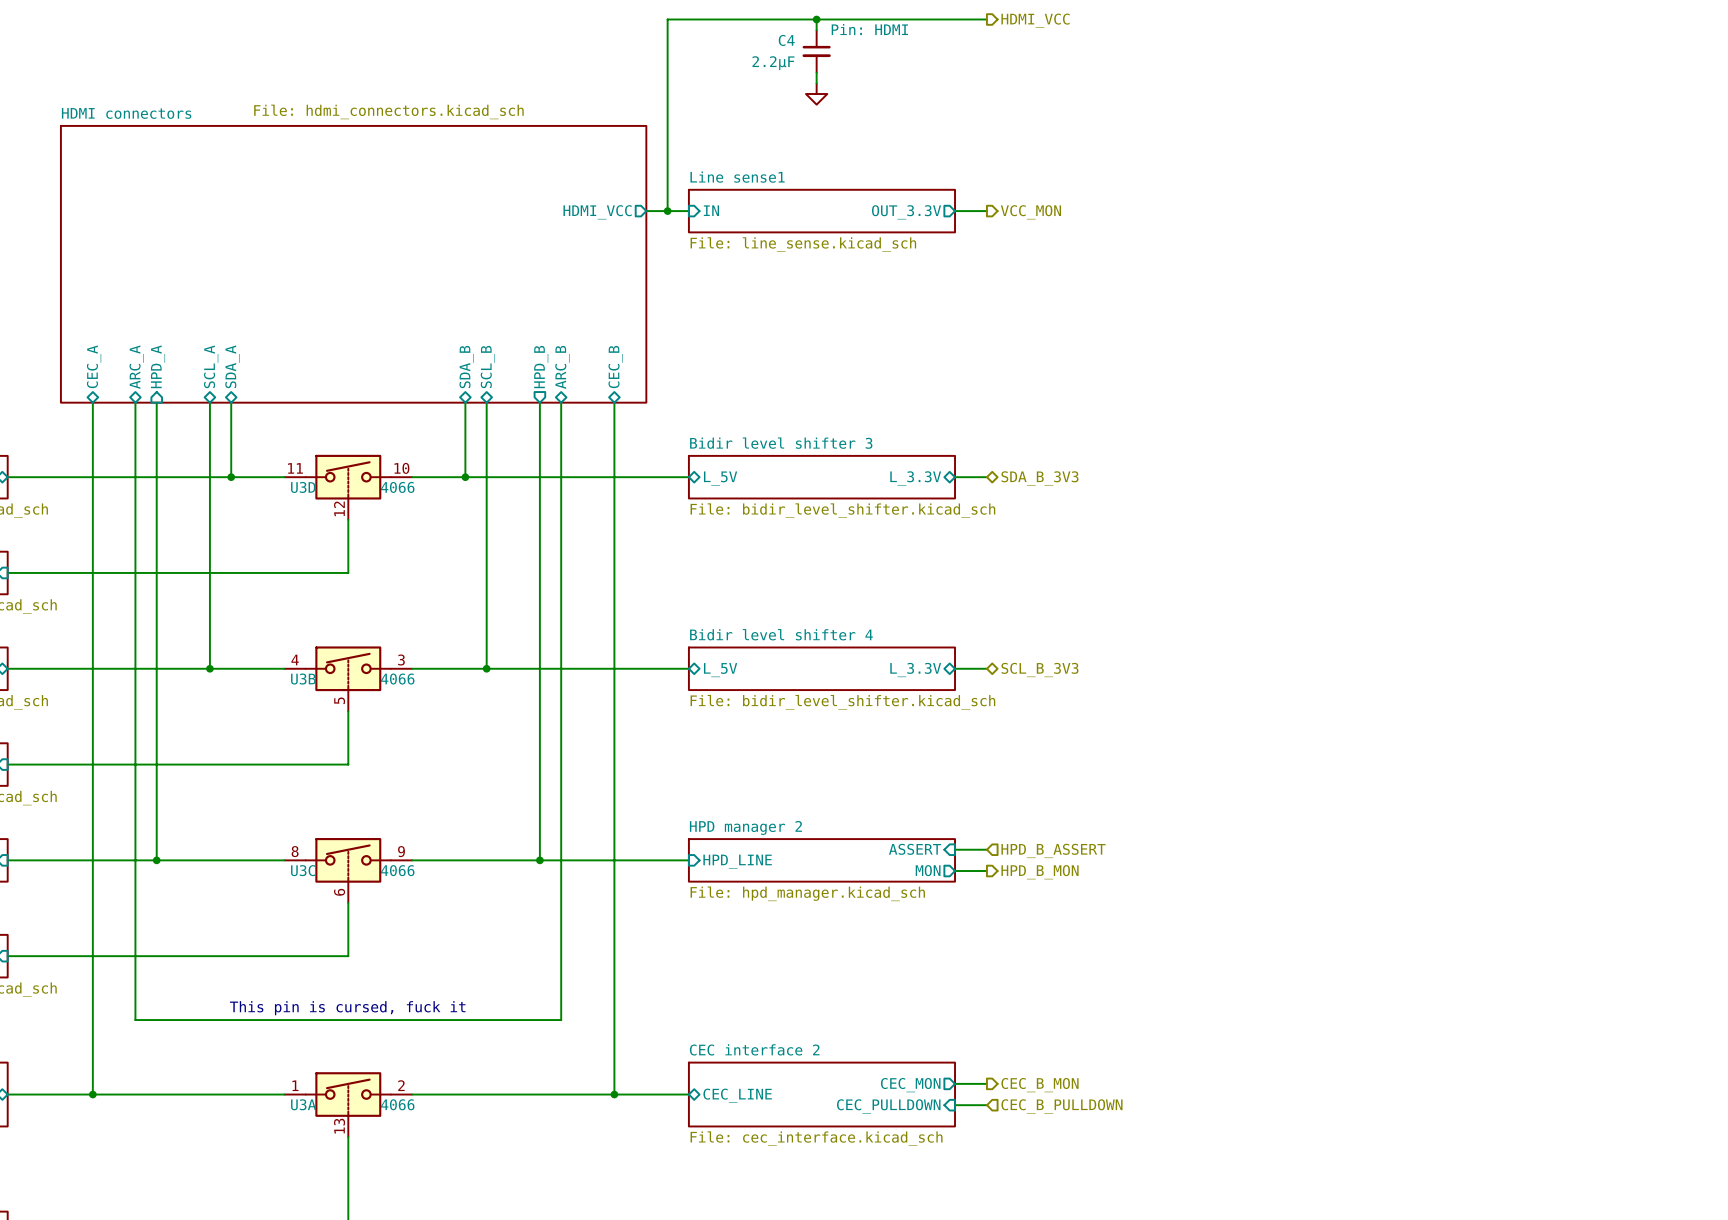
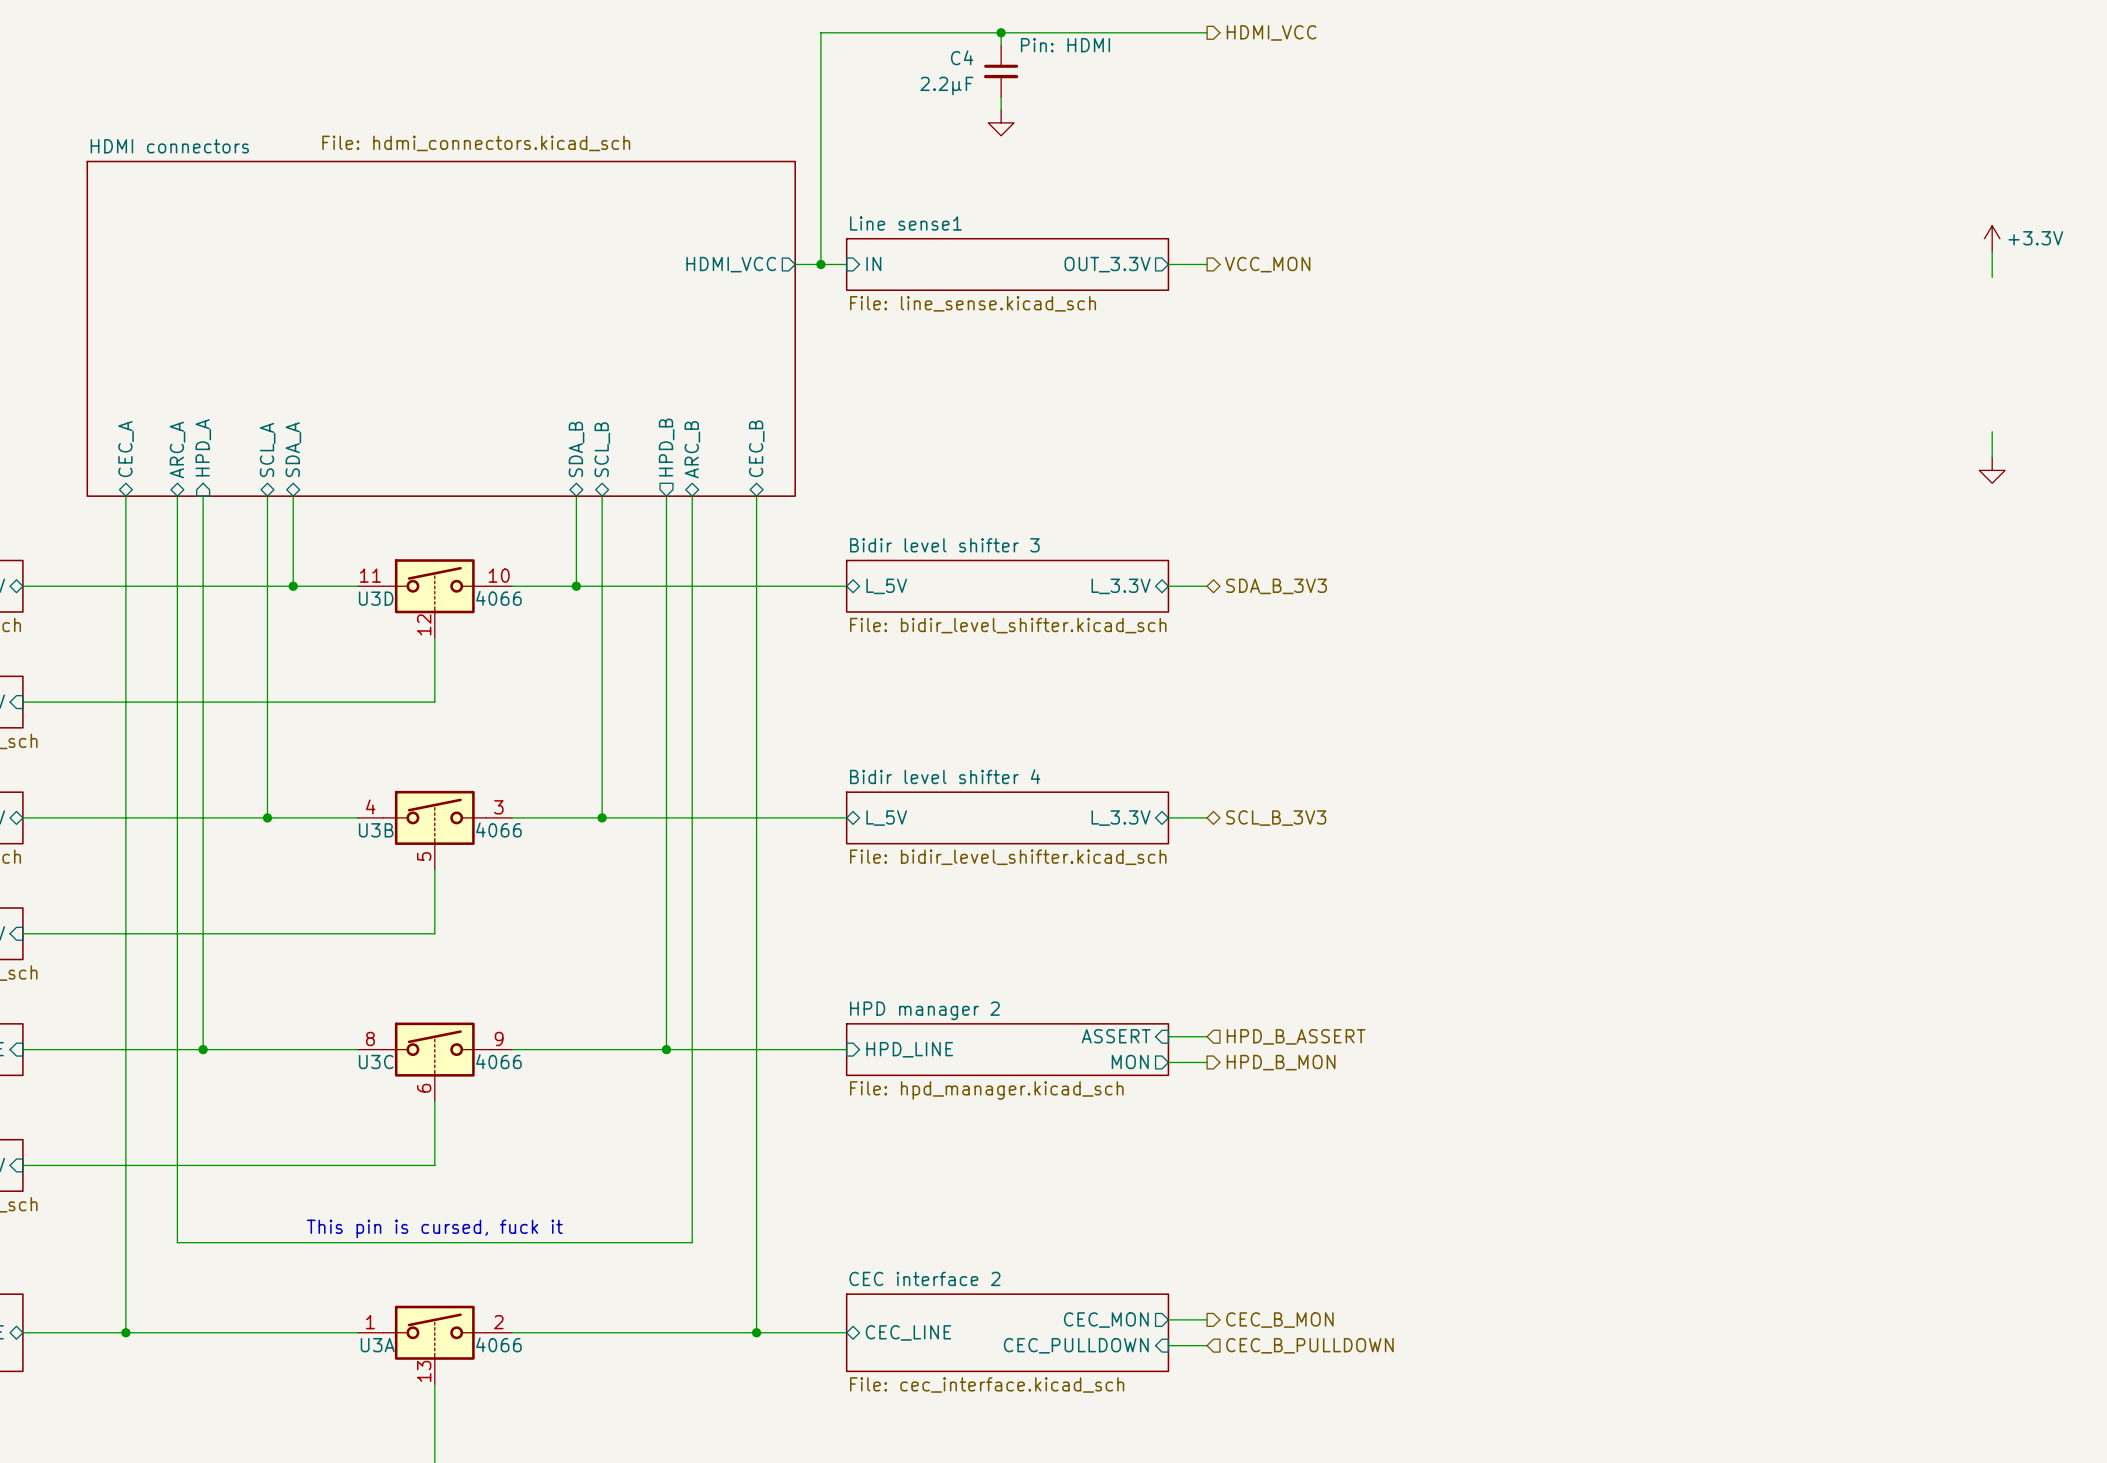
power symbol: none -> +3.3V (1992, 238)
wire: none -> (1992, 251) (1992, 277)
wire: none -> (1992, 431) (1992, 457)
power symbol: none -> (1992, 470)

